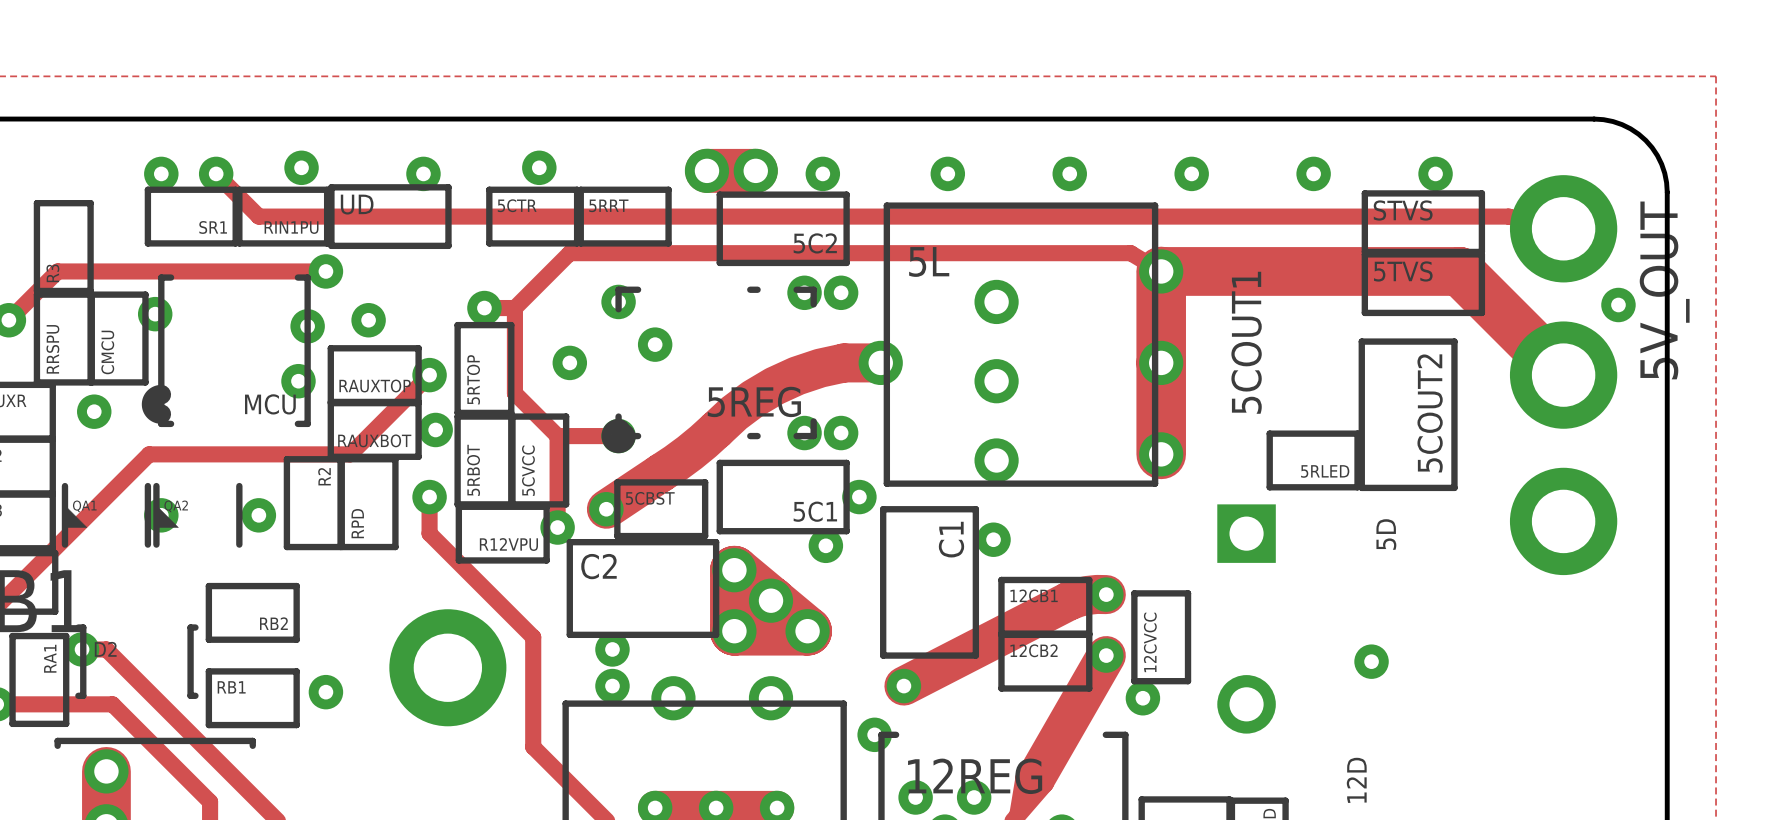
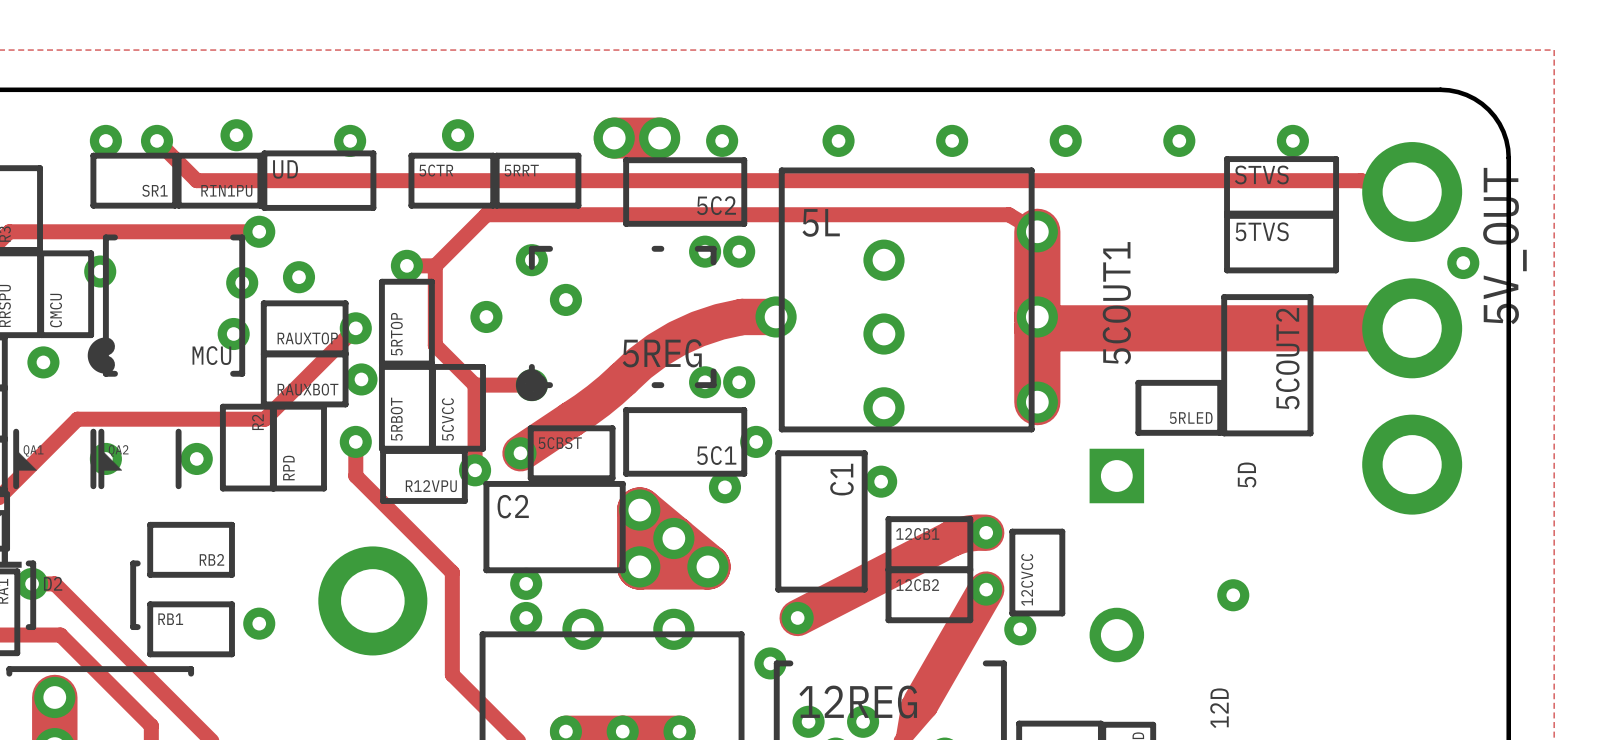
track: (1161, 271) (1459, 271) (1563, 375) -> (1037, 328) (1412, 328)
track: (350, 454) (149, 454) (130, 472) -> (281, 402) (264, 419) (77, 419)

